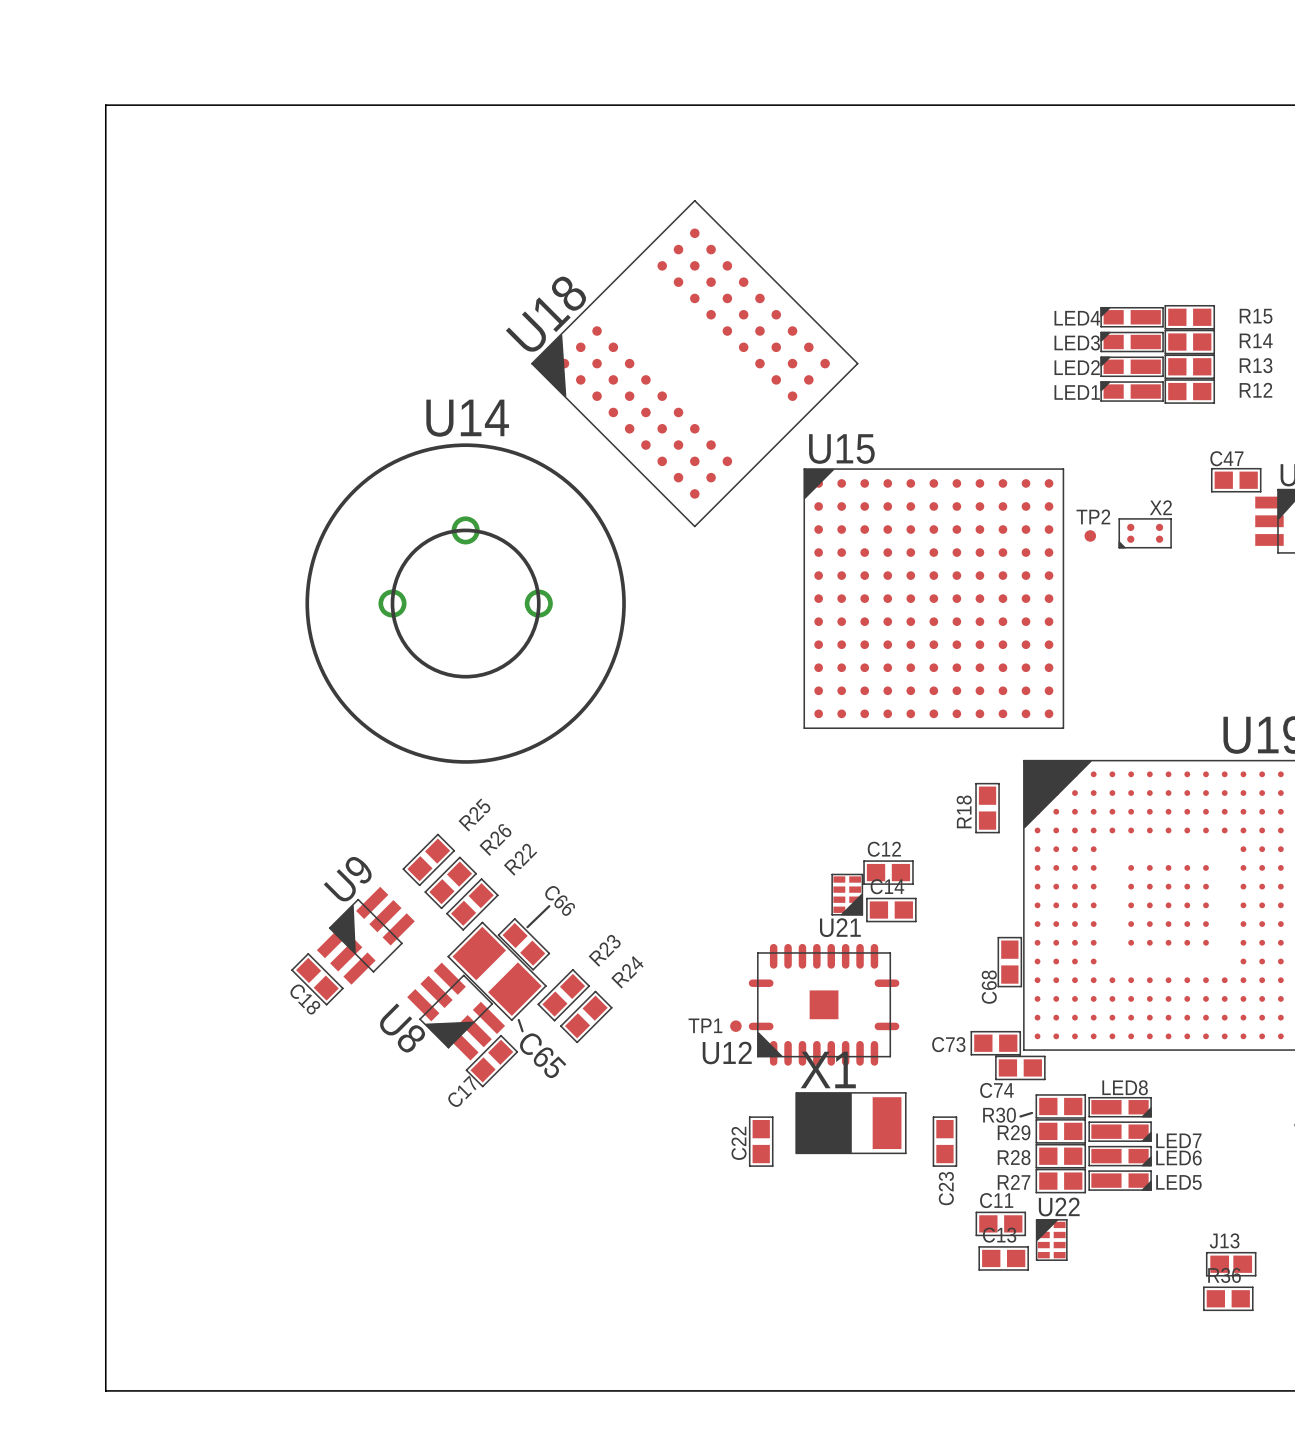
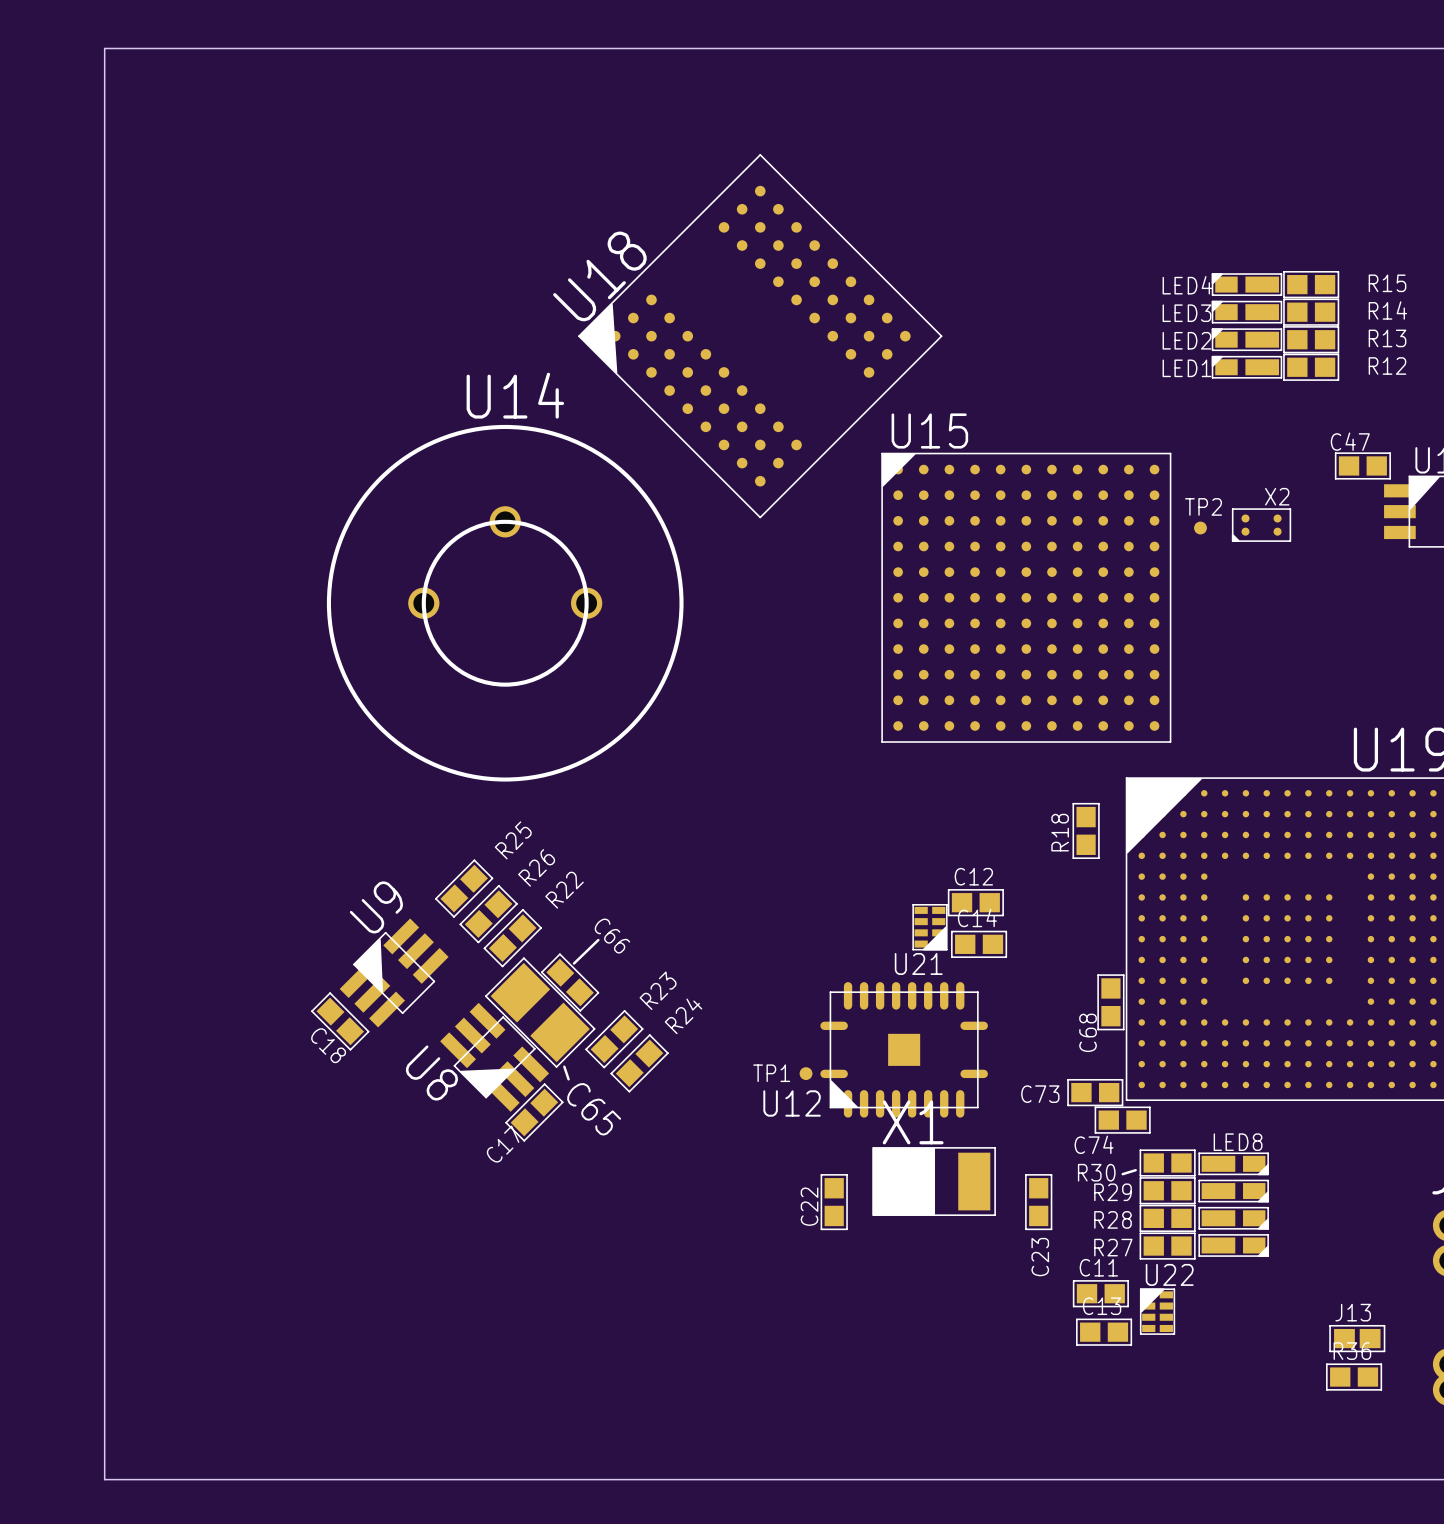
LED7 name: LED7 (1178, 1140) -> none
LED6 name: LED6 (1178, 1157) -> none
LED5 name: LED5 (1178, 1182) -> none

